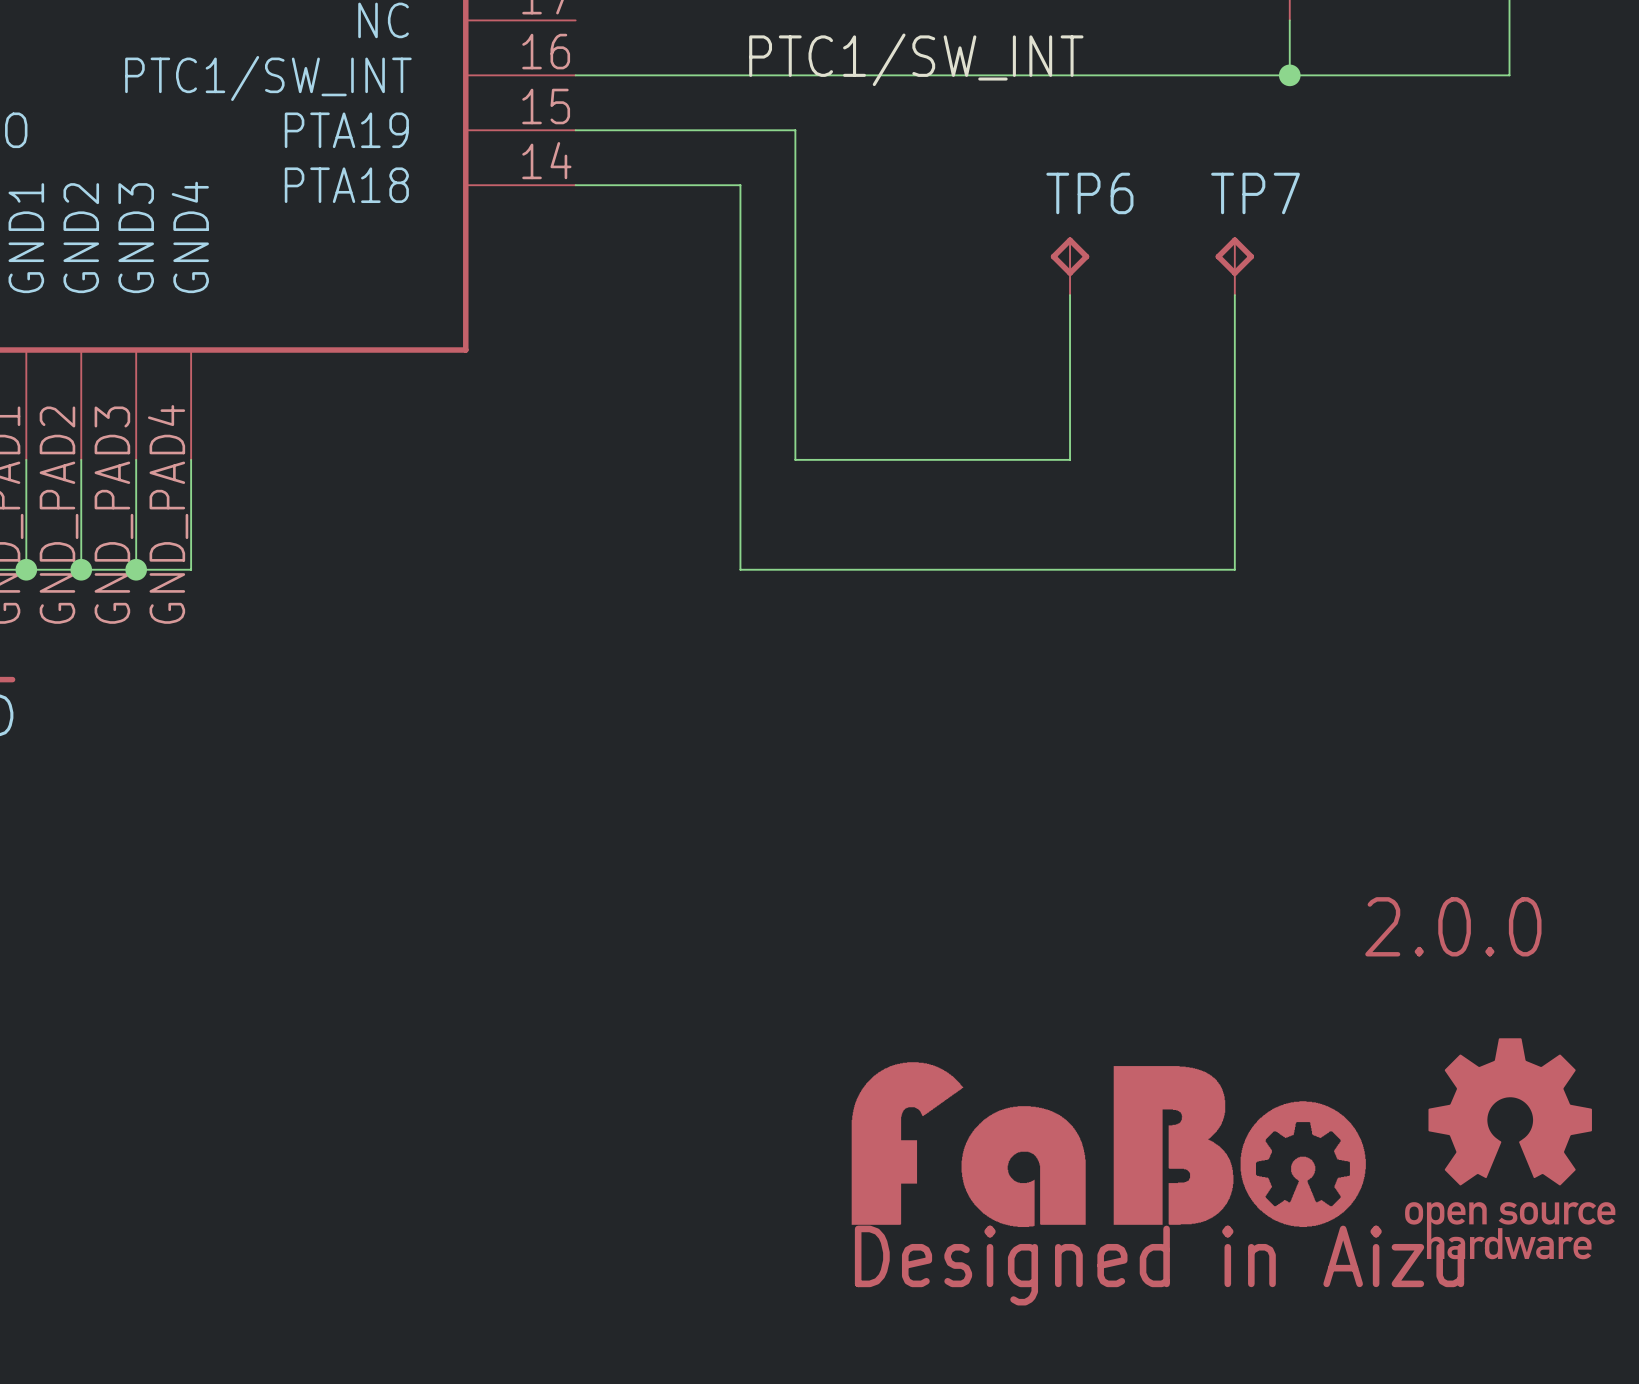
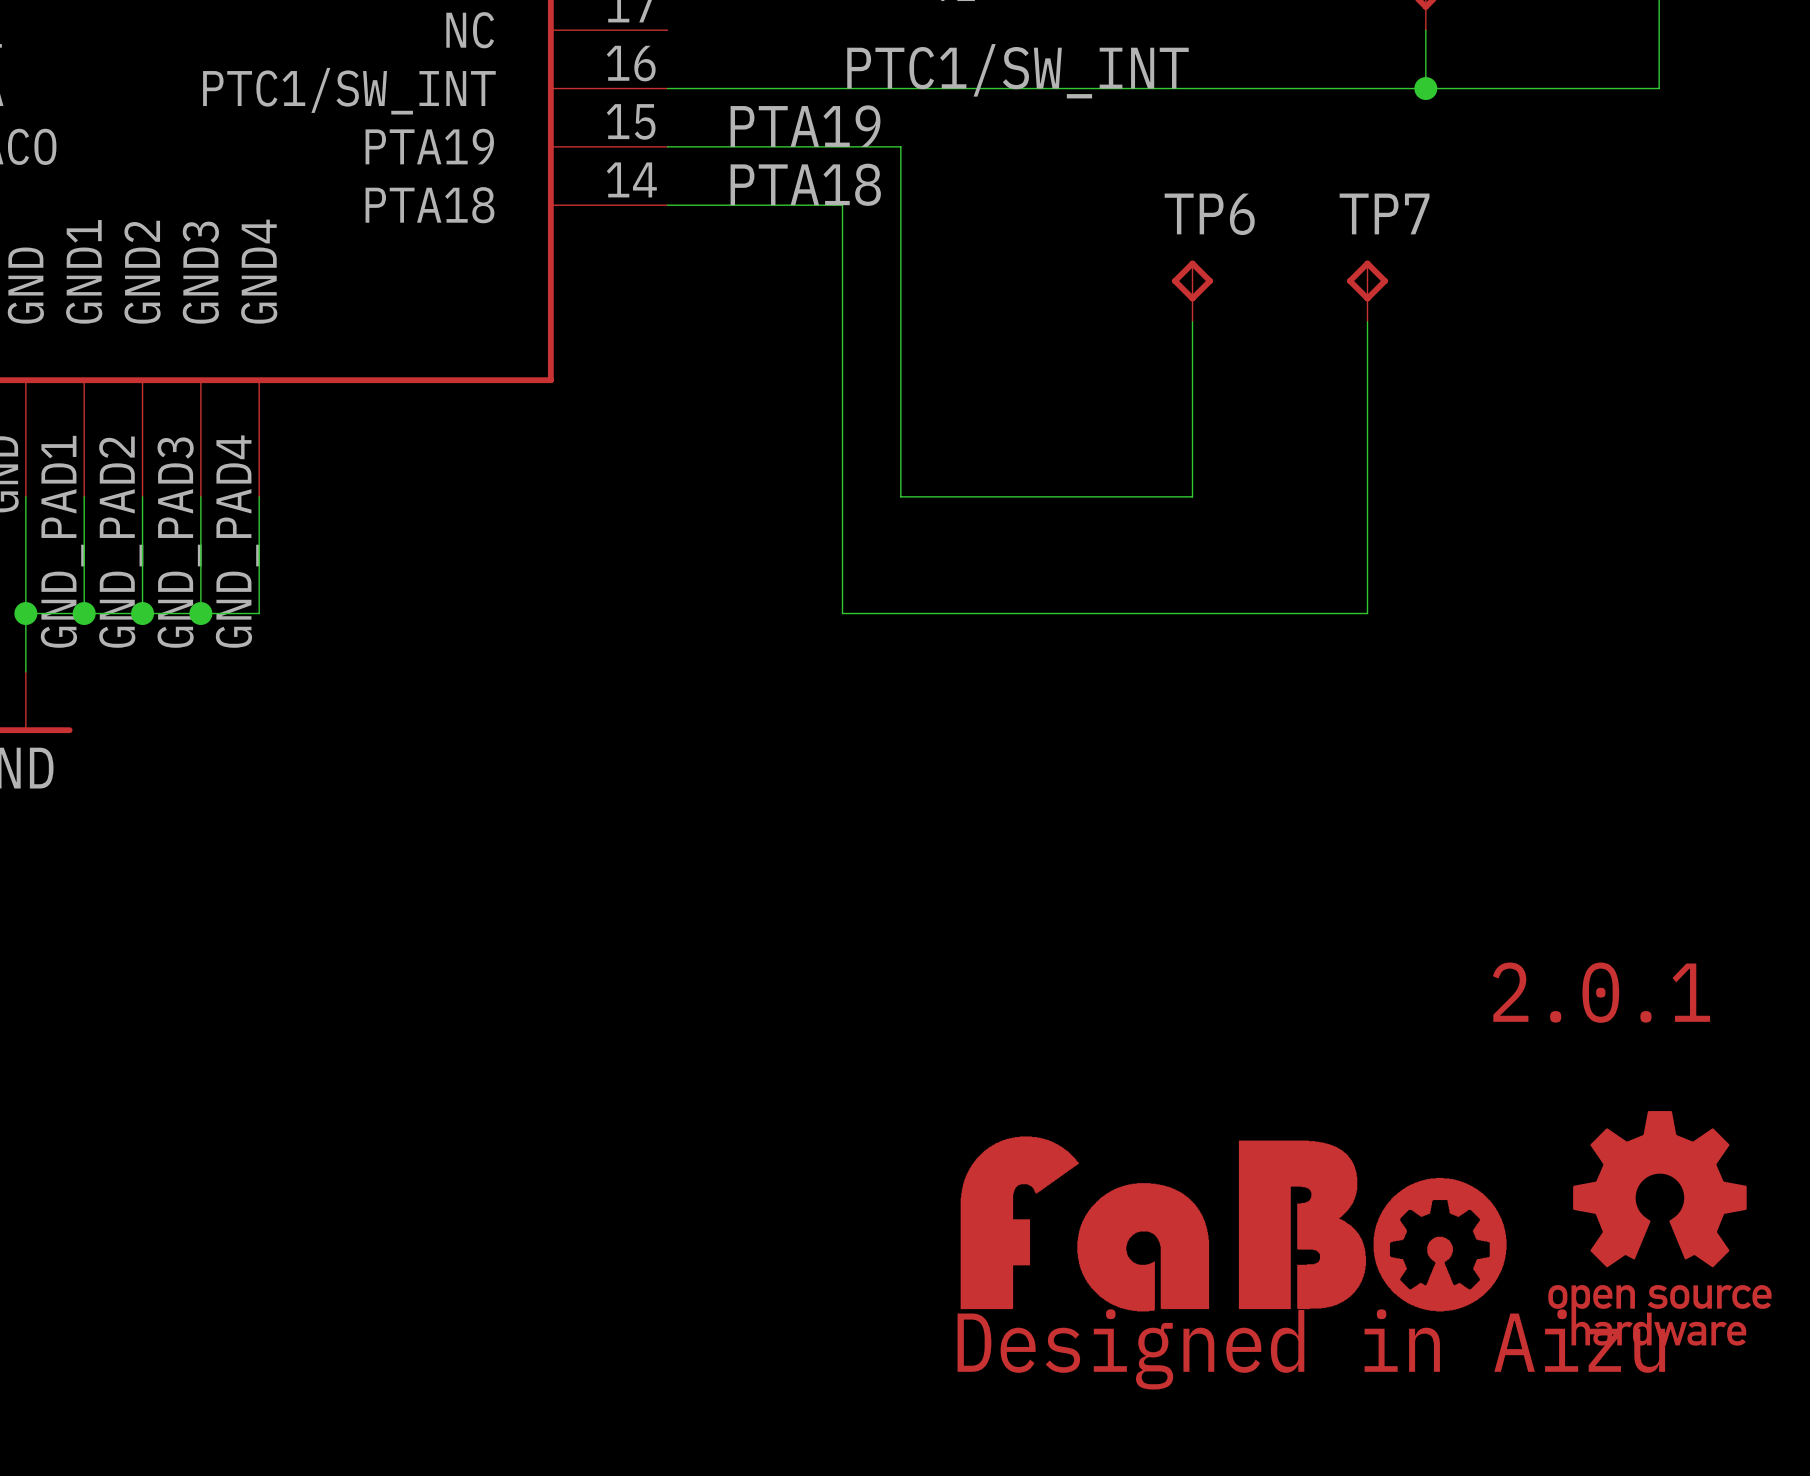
label: none -> PTA19 (805, 126)
label: none -> PTA18 (805, 184)
text: 2.0.0 (1453, 926) -> 2.0.1 (1601, 992)

